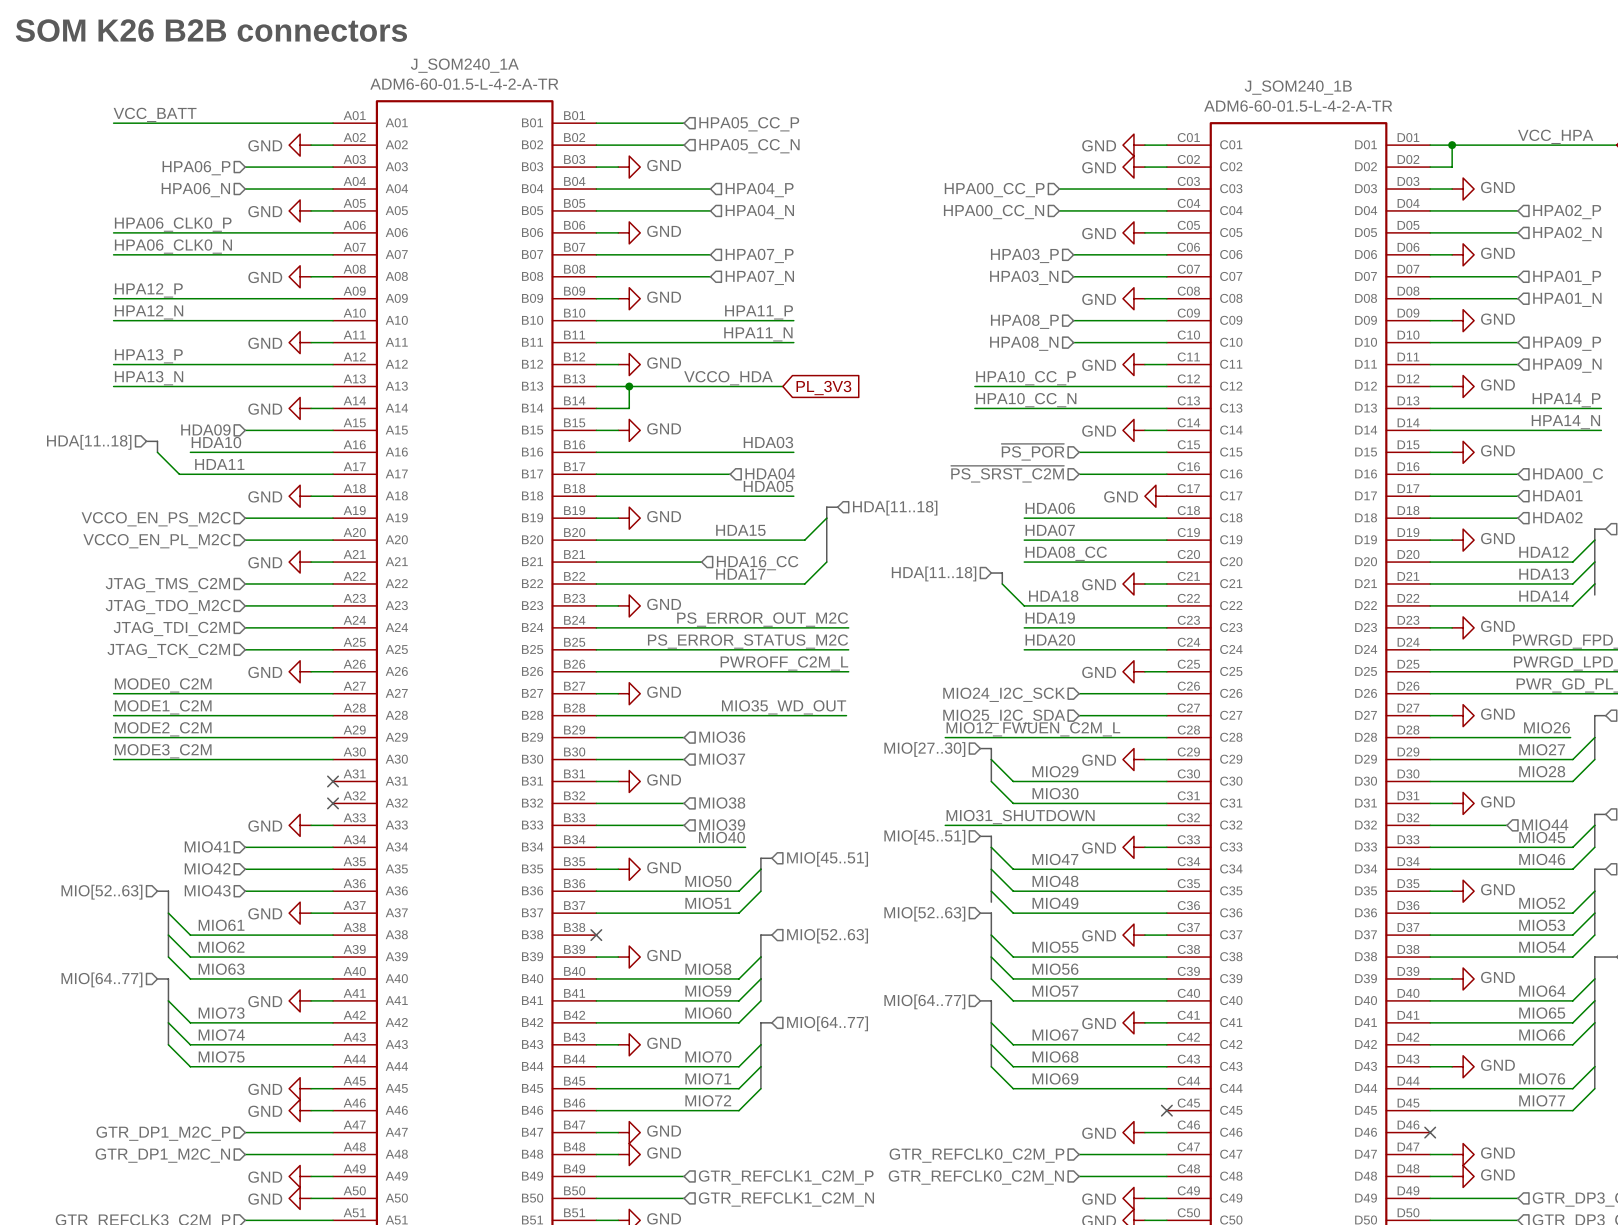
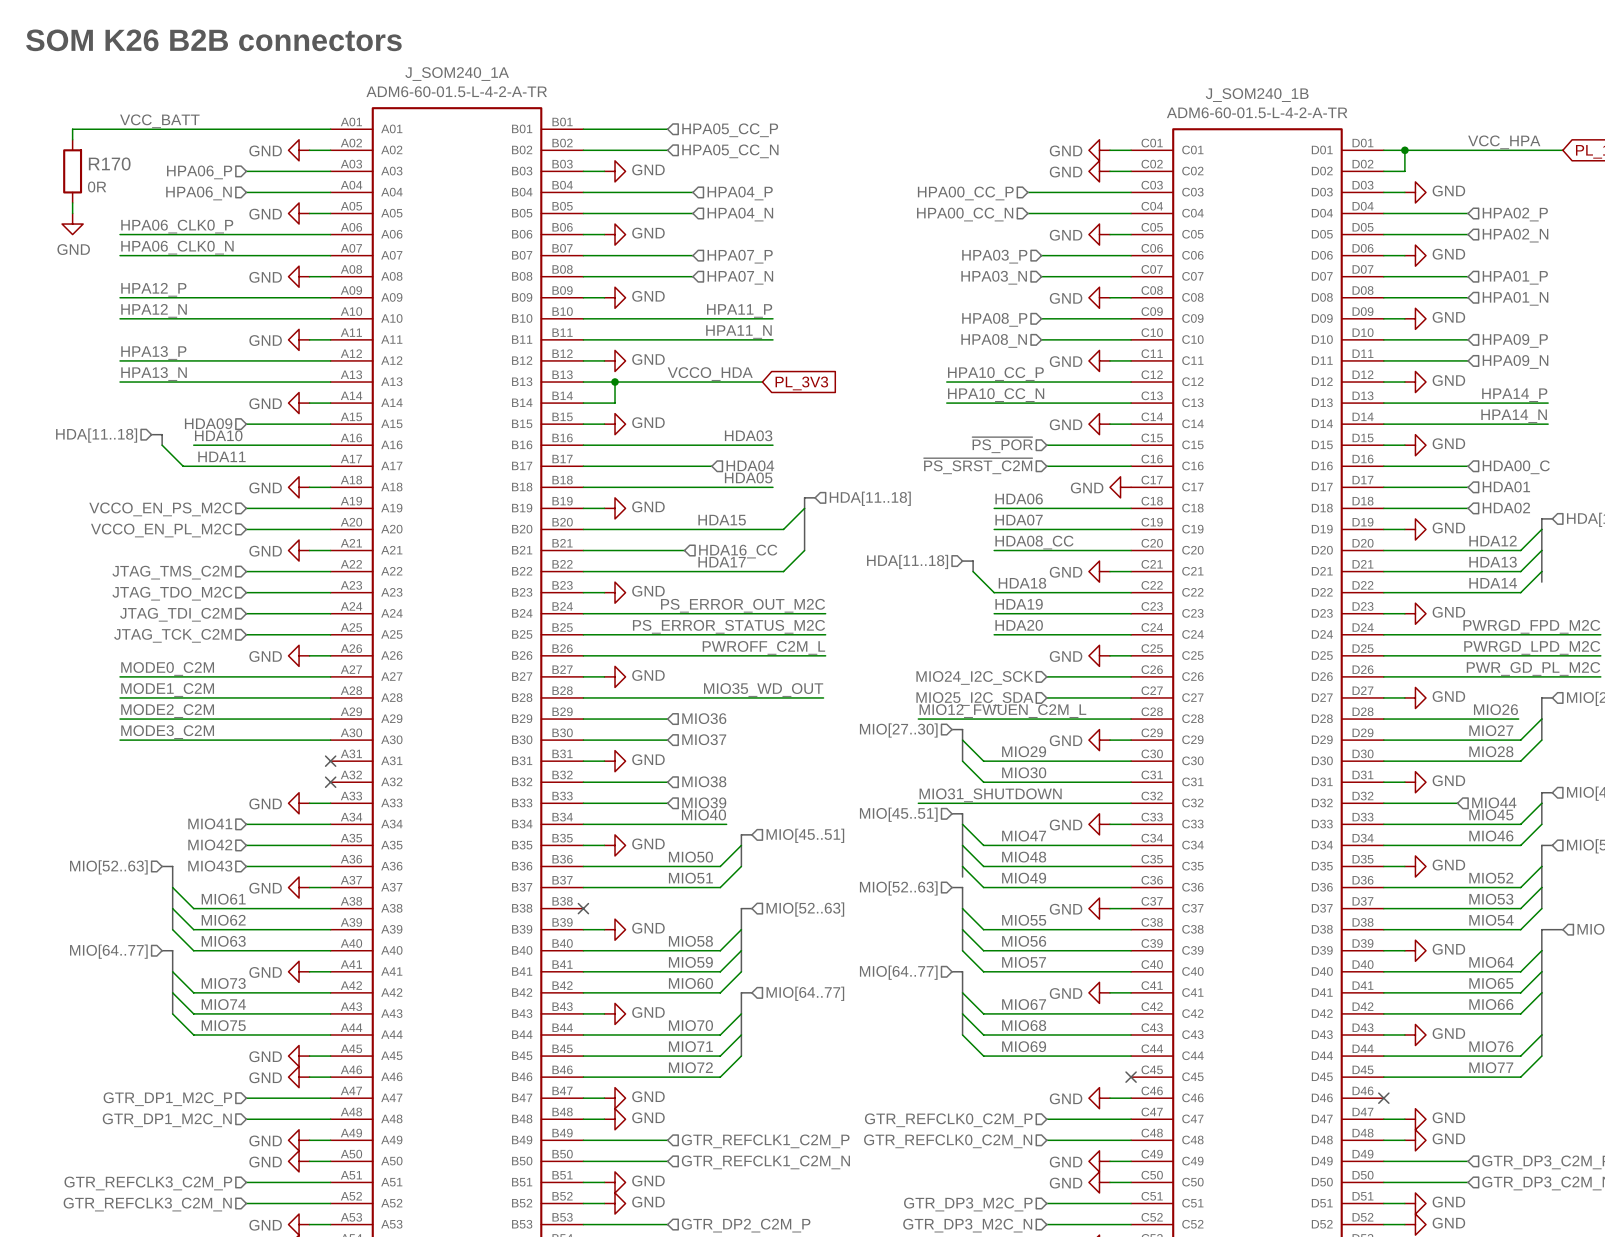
wire: none -> (120, 129) (72, 129) (72, 139)
R170: none -> (72, 171)
wire: none -> (72, 202) (72, 213)
power symbol: none -> GND (72, 224)

